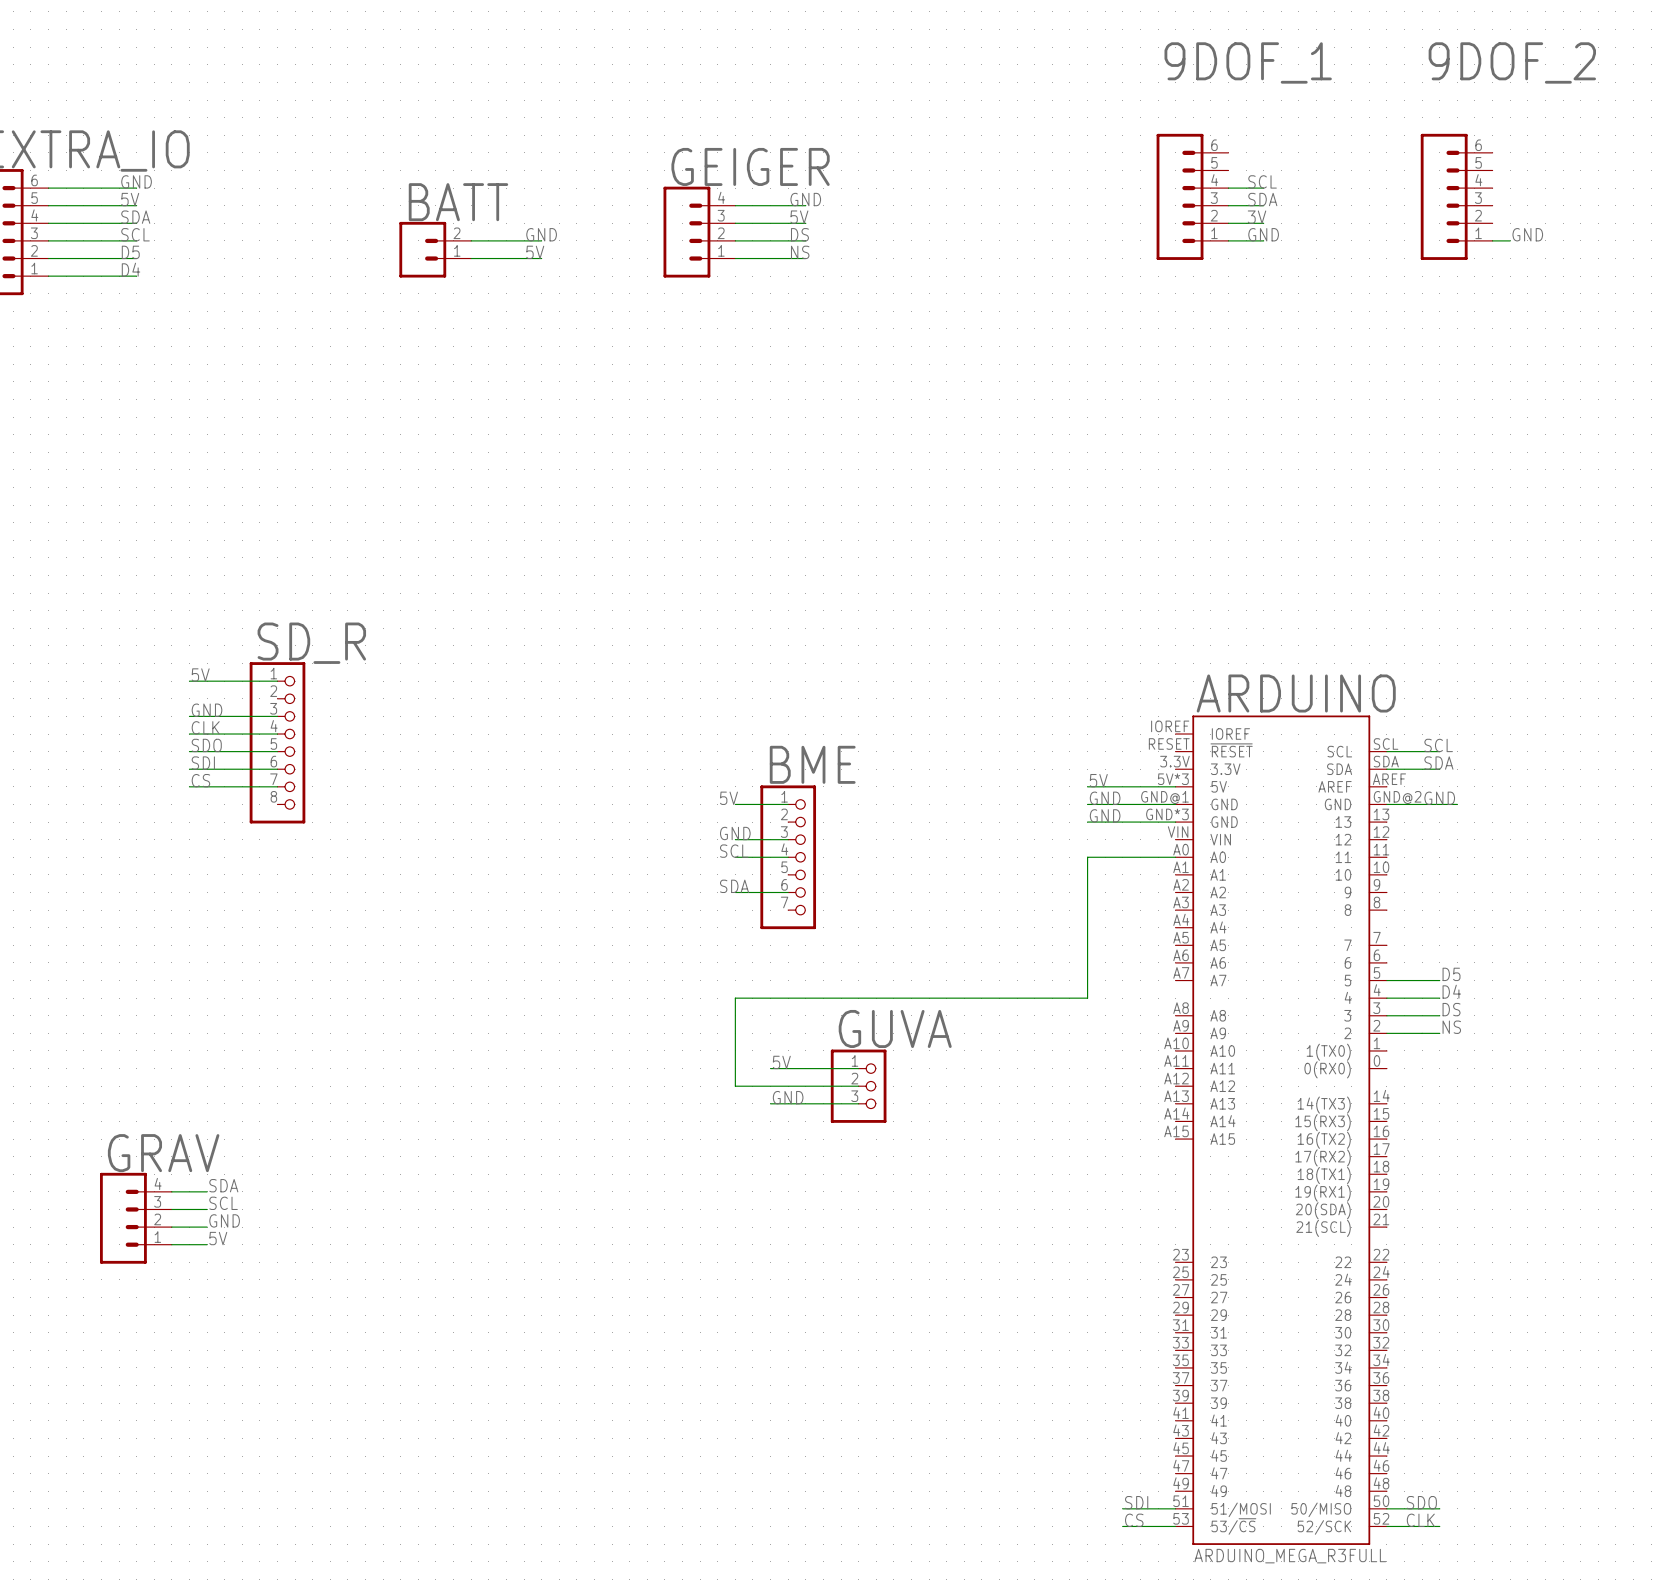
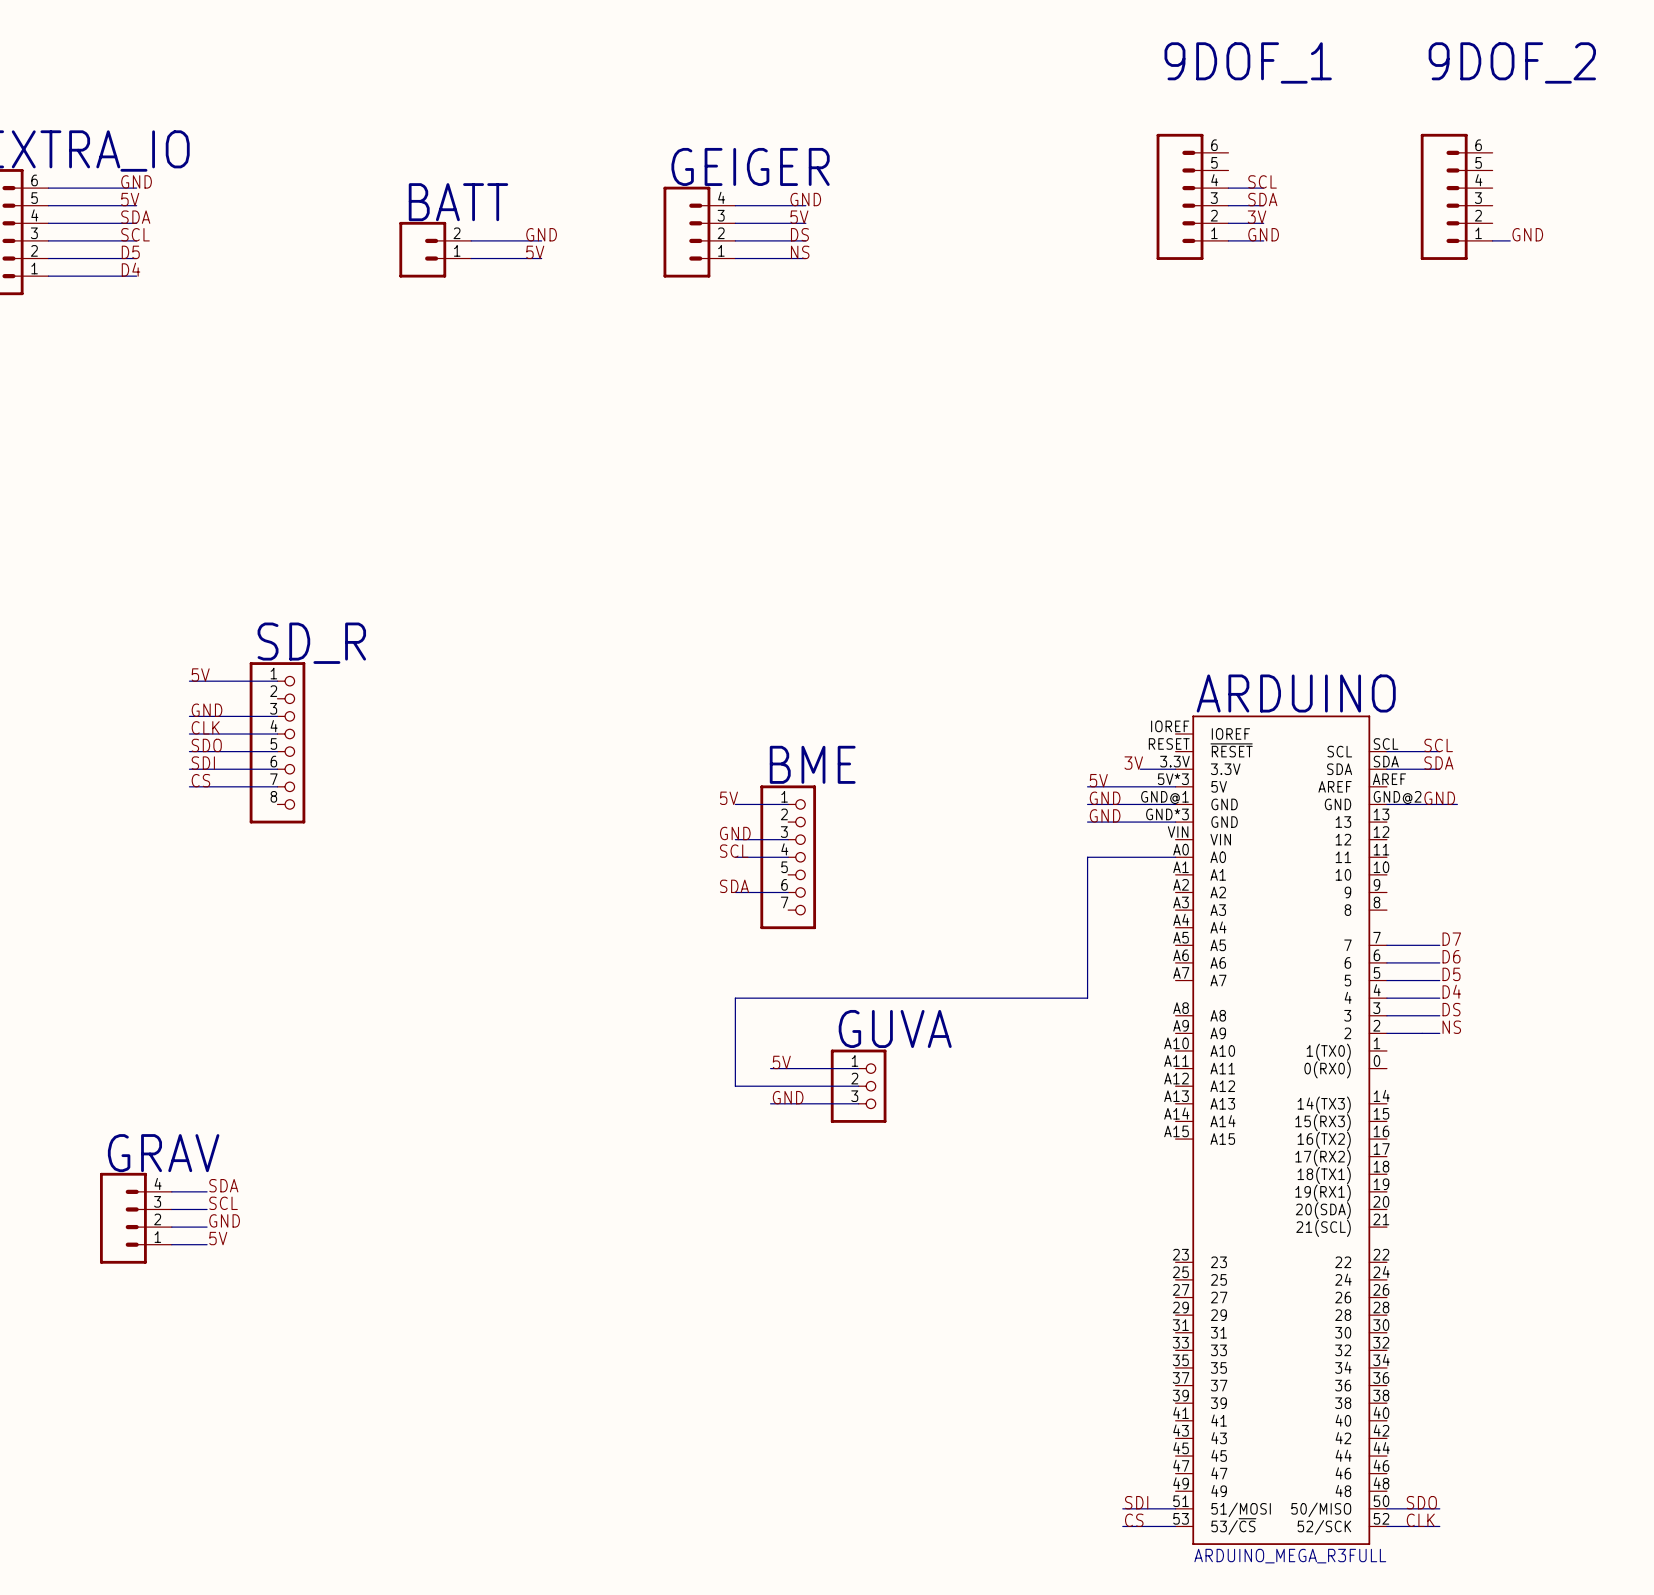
label: none -> 3V (1133, 763)
wire: none -> (1140, 769) (1175, 769)
label: none -> D7 (1451, 939)
wire: none -> (1386, 945) (1439, 945)
label: none -> D6 (1451, 956)
wire: none -> (1386, 962) (1439, 962)

